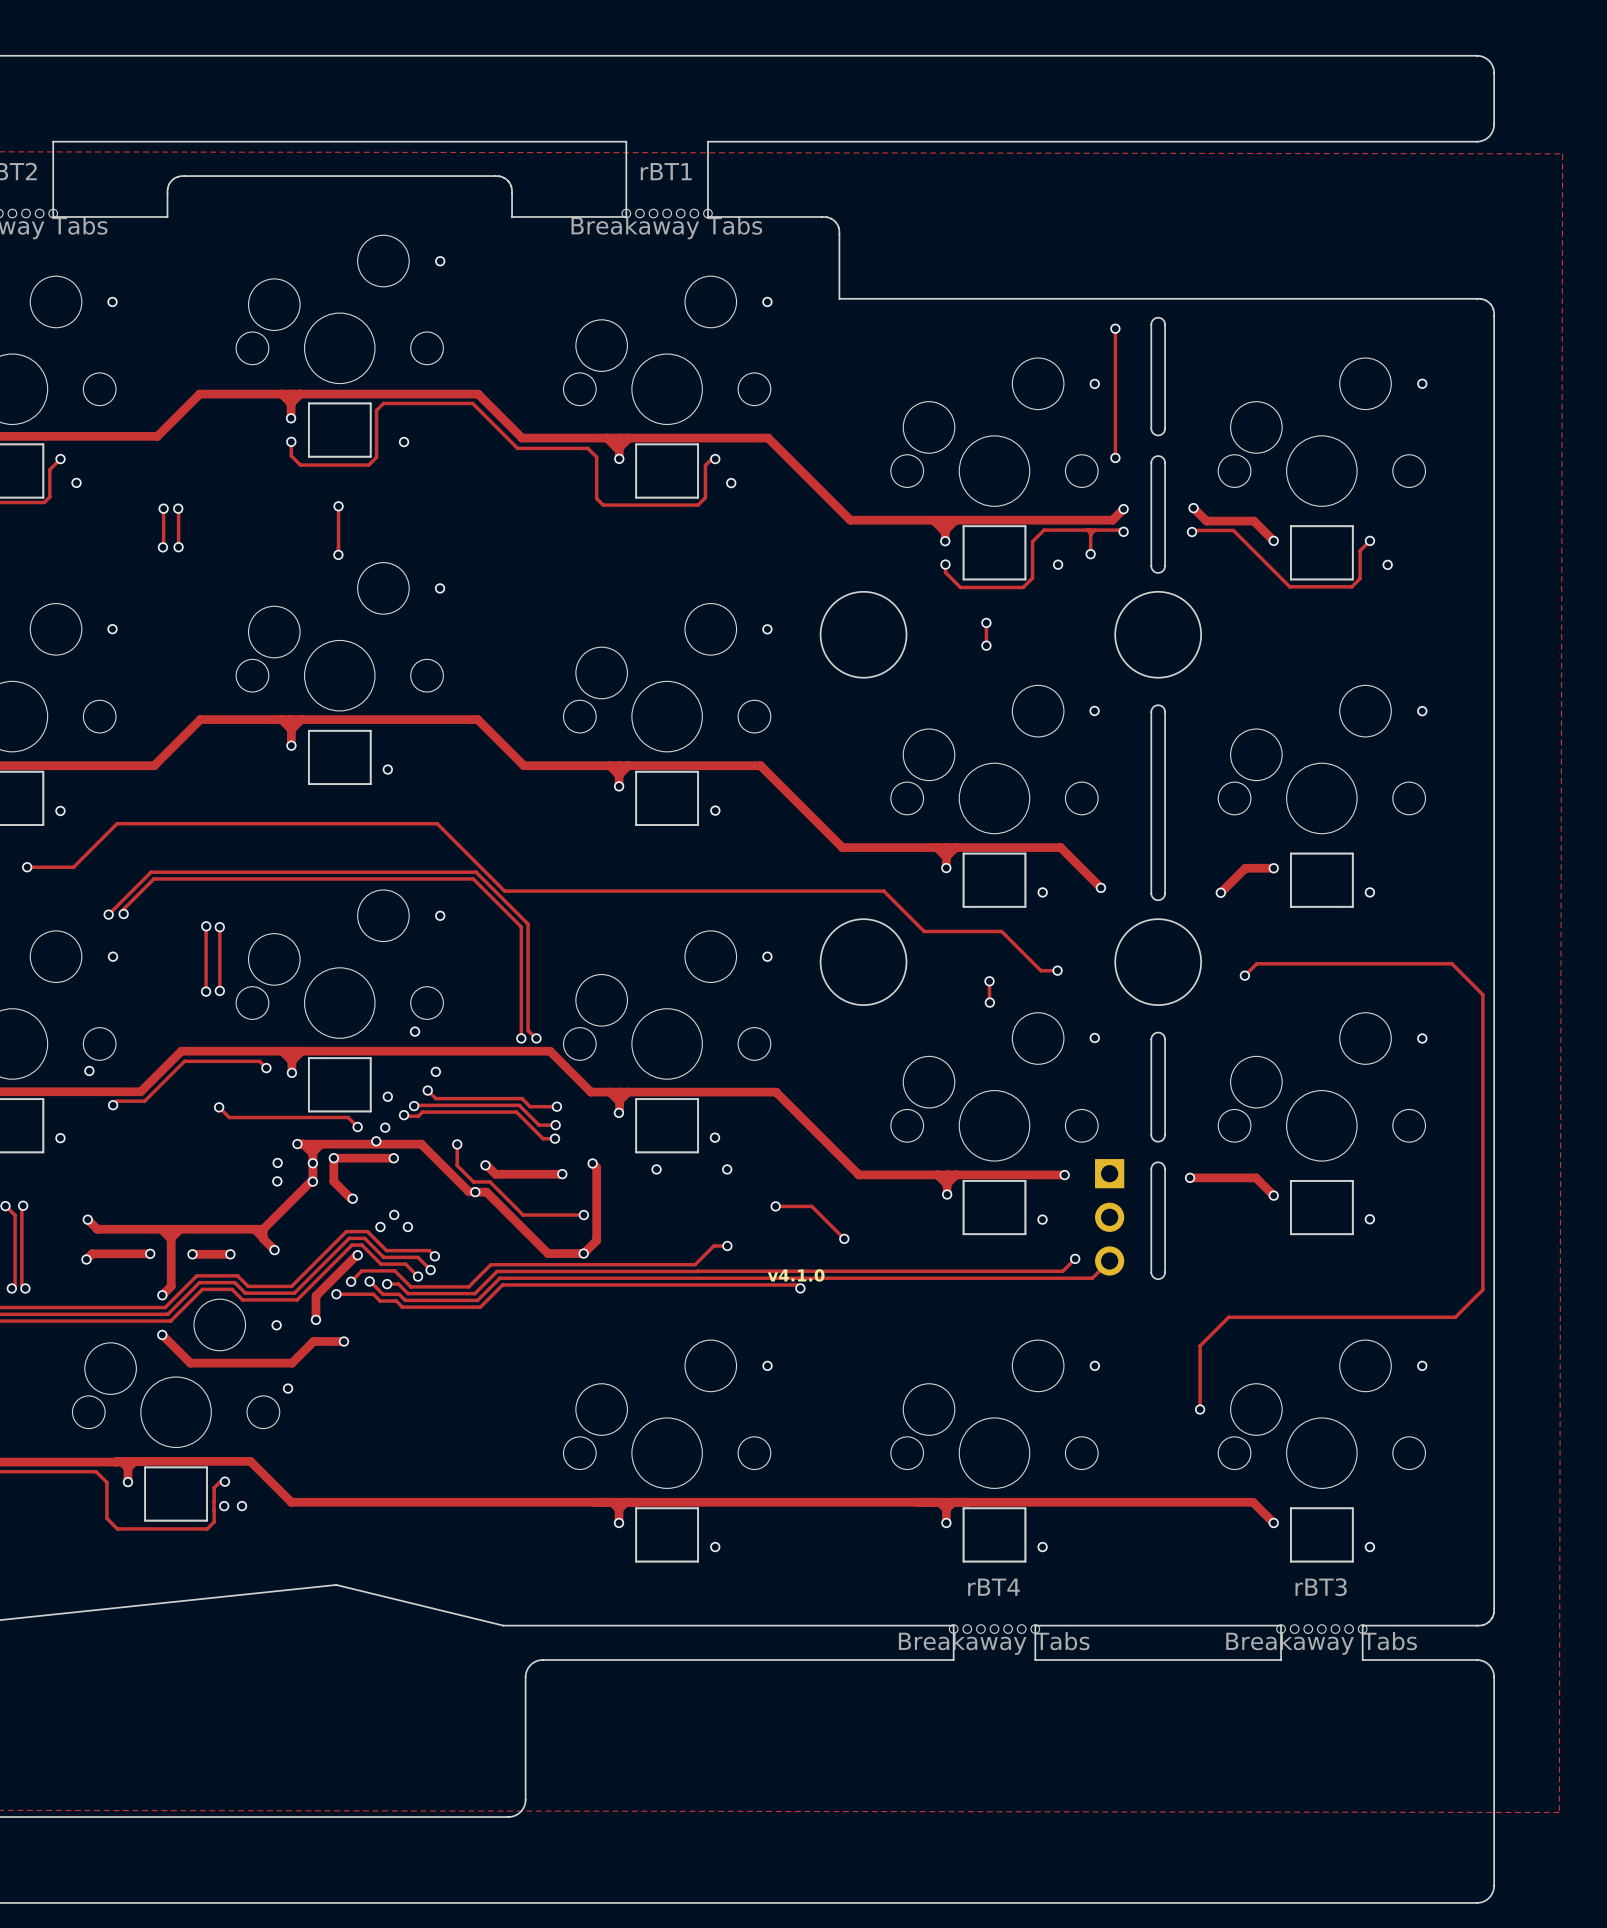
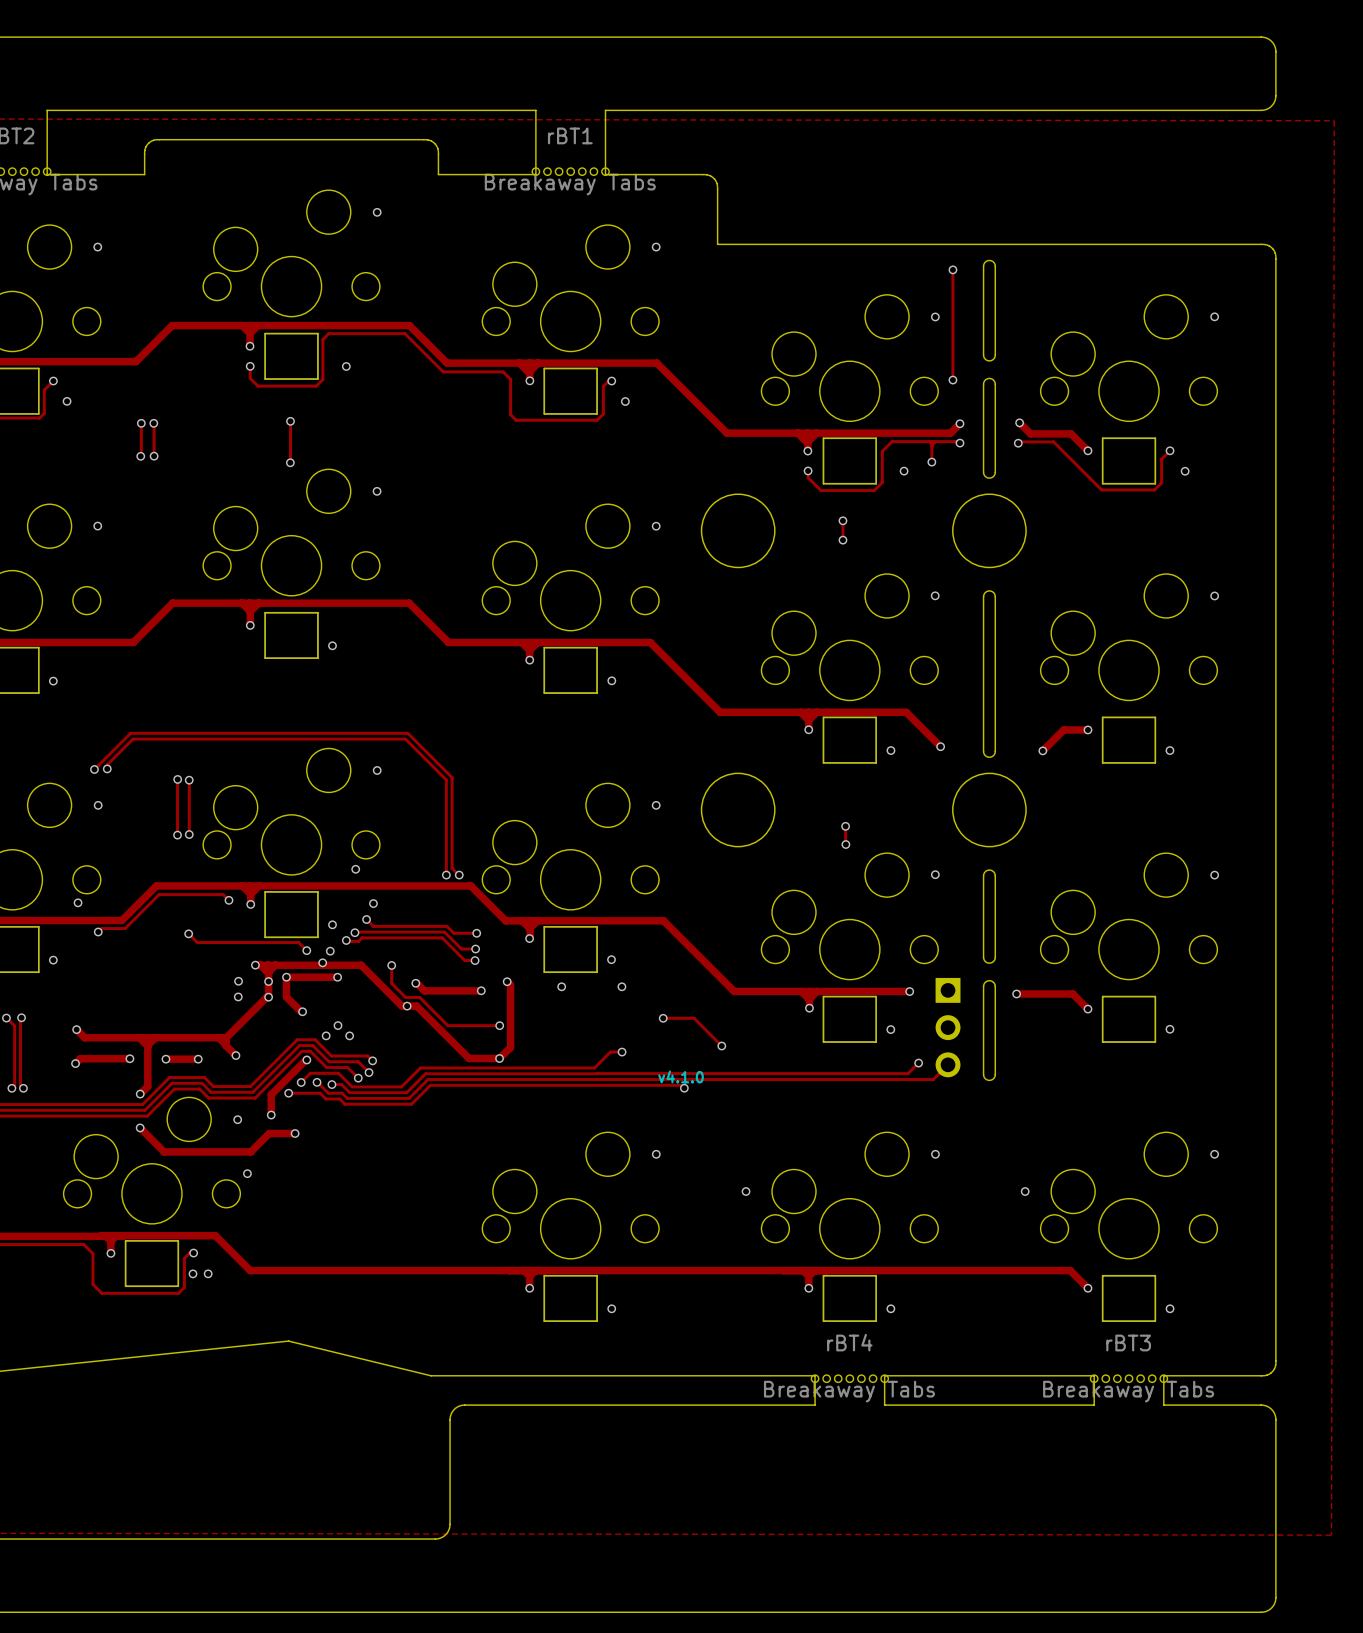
track: (27, 867) (73, 867) (117, 823) (437, 823) (504, 891) (883, 891) (924, 931) (1001, 931) (1040, 970) (1057, 970) -> none
via: (27, 867) -> none
via: (1057, 970) -> none
track: (1244, 975) (1256, 963) (1451, 963) (1482, 994) (1482, 1289) (1455, 1317) (1228, 1317) (1200, 1345) (1200, 1409) -> none
via: (1244, 975) -> none
via: none -> (746, 1191)

